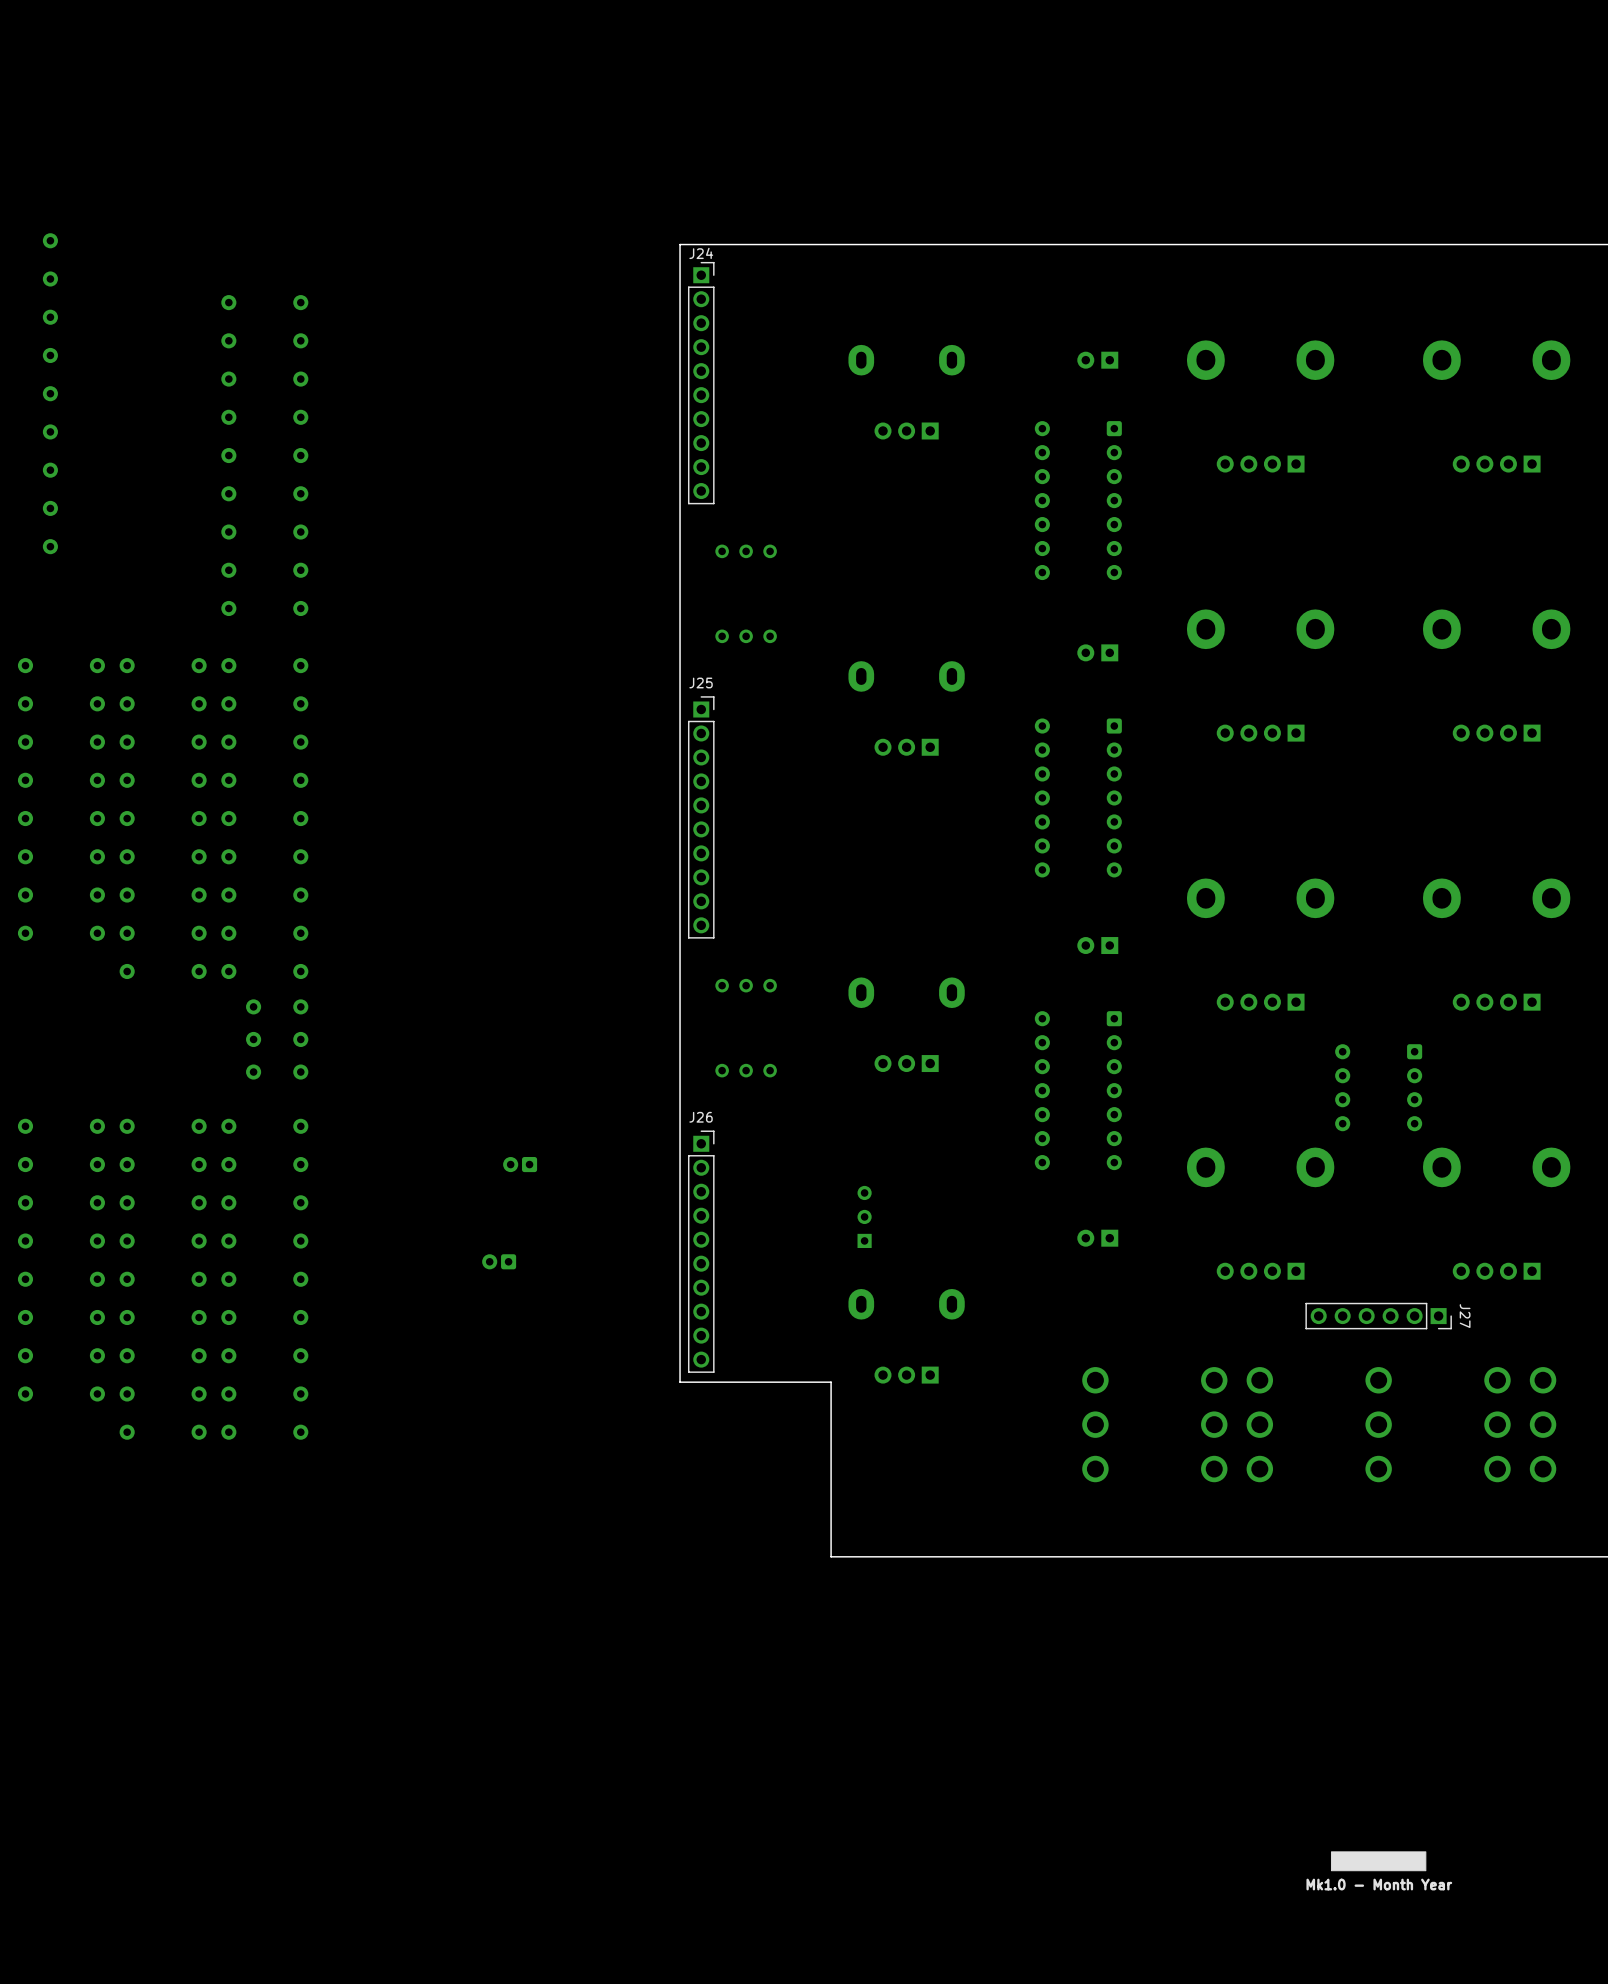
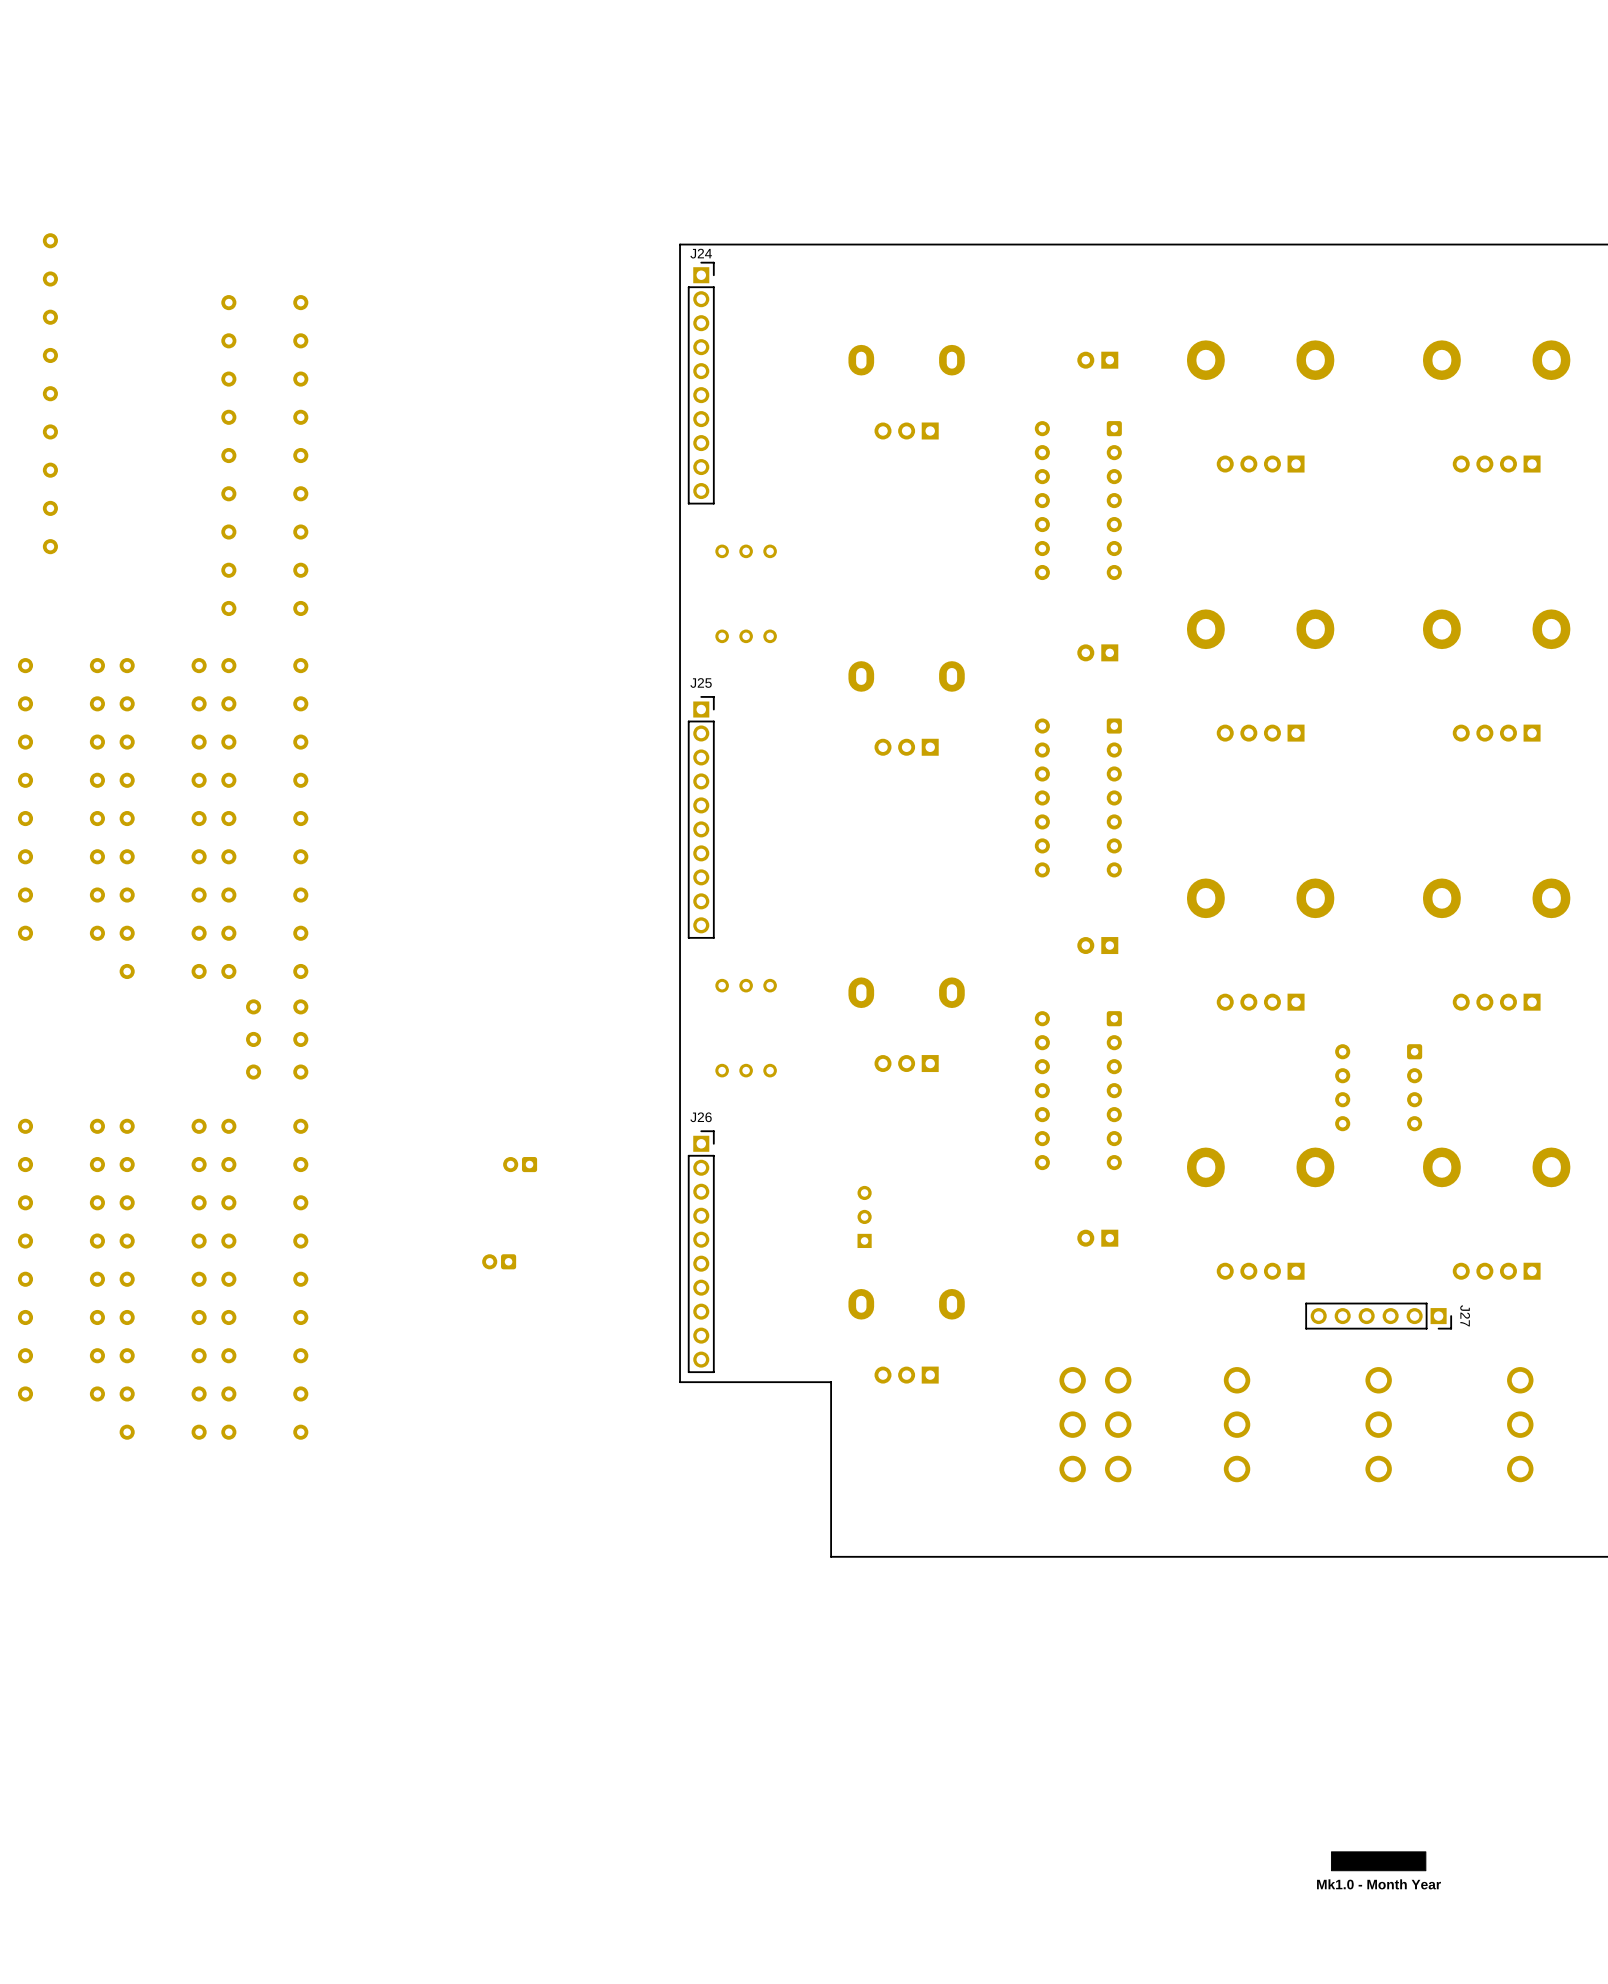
part footprint: [1082, 1367, 1109, 1483] -> [1059, 1367, 1132, 1483]
part footprint: [1201, 1367, 1274, 1483] -> [1223, 1367, 1251, 1483]
part footprint: [1484, 1367, 1557, 1483] -> [1507, 1367, 1534, 1483]

